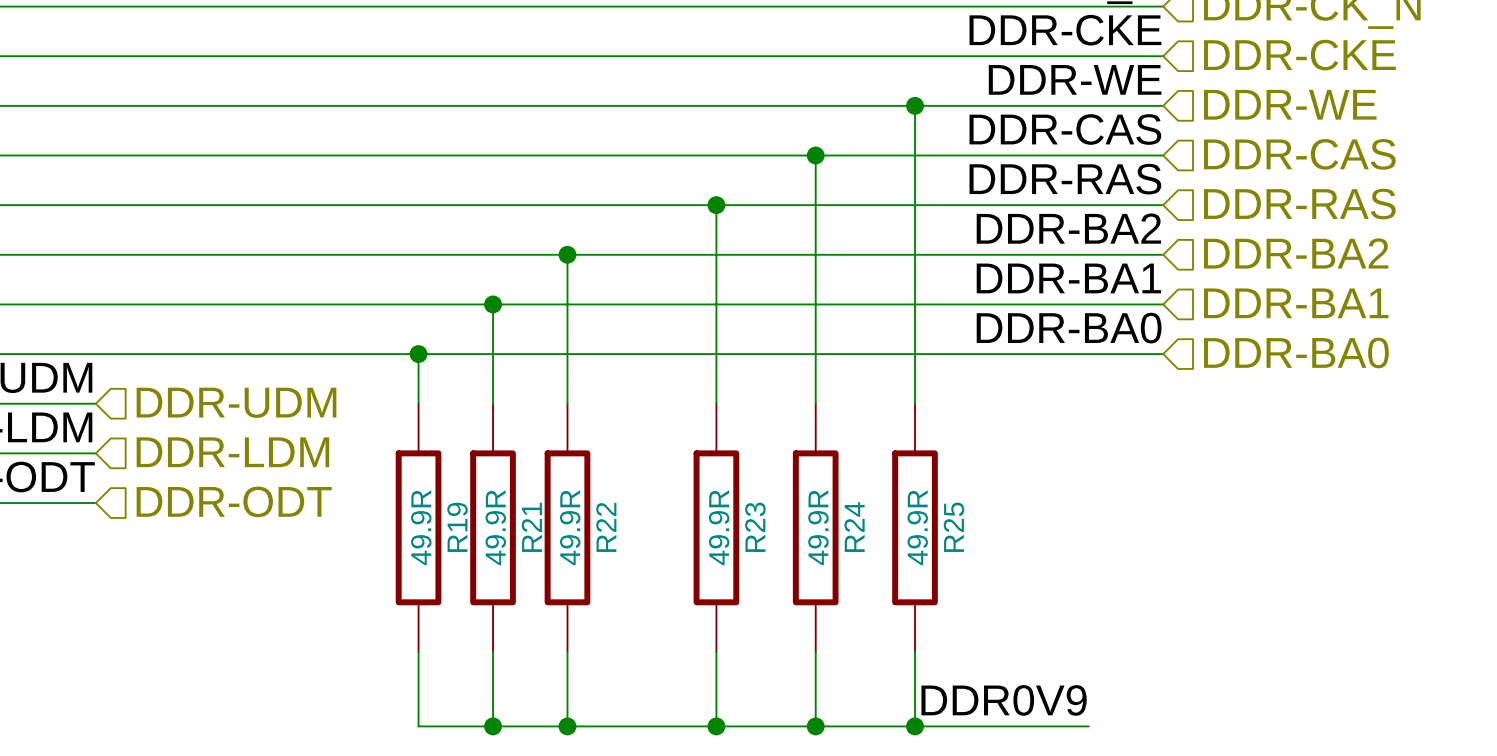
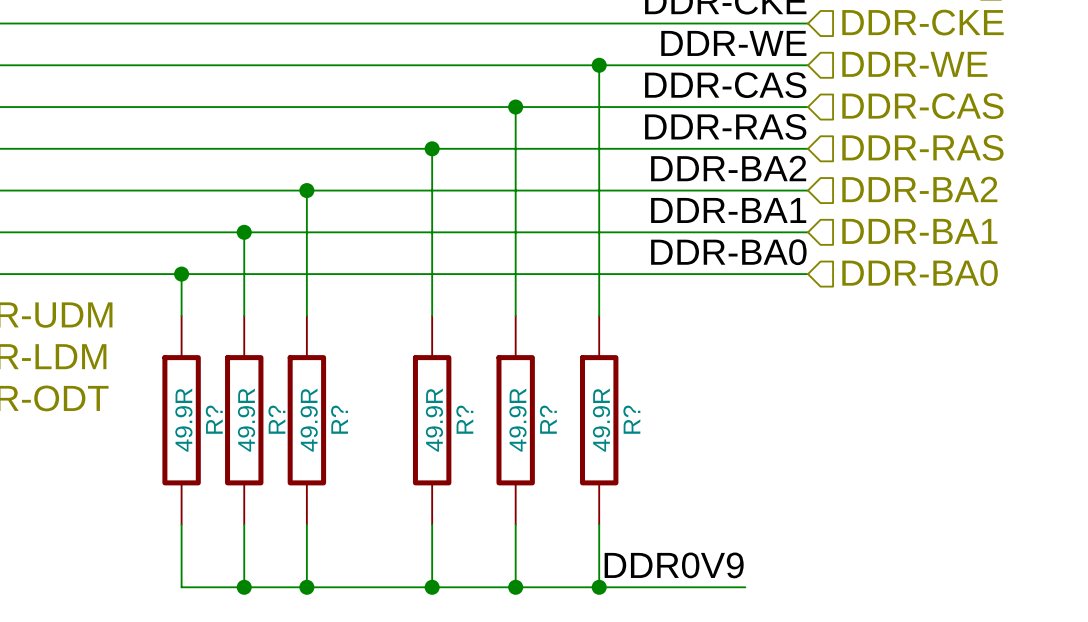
R19 name: R19 (457, 527) -> R? (214, 419)
R21 name: R21 (531, 527) -> R? (276, 419)
R22 name: R22 (606, 527) -> R? (339, 419)
R23 name: R23 (755, 527) -> R? (464, 419)
R24 name: R24 (854, 527) -> R? (548, 419)
R25 name: R25 (953, 527) -> R? (631, 419)

